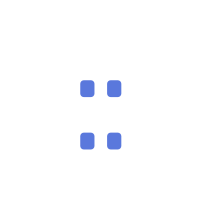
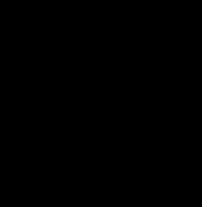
part: (100, 88) -> none
part: (100, 141) -> none

